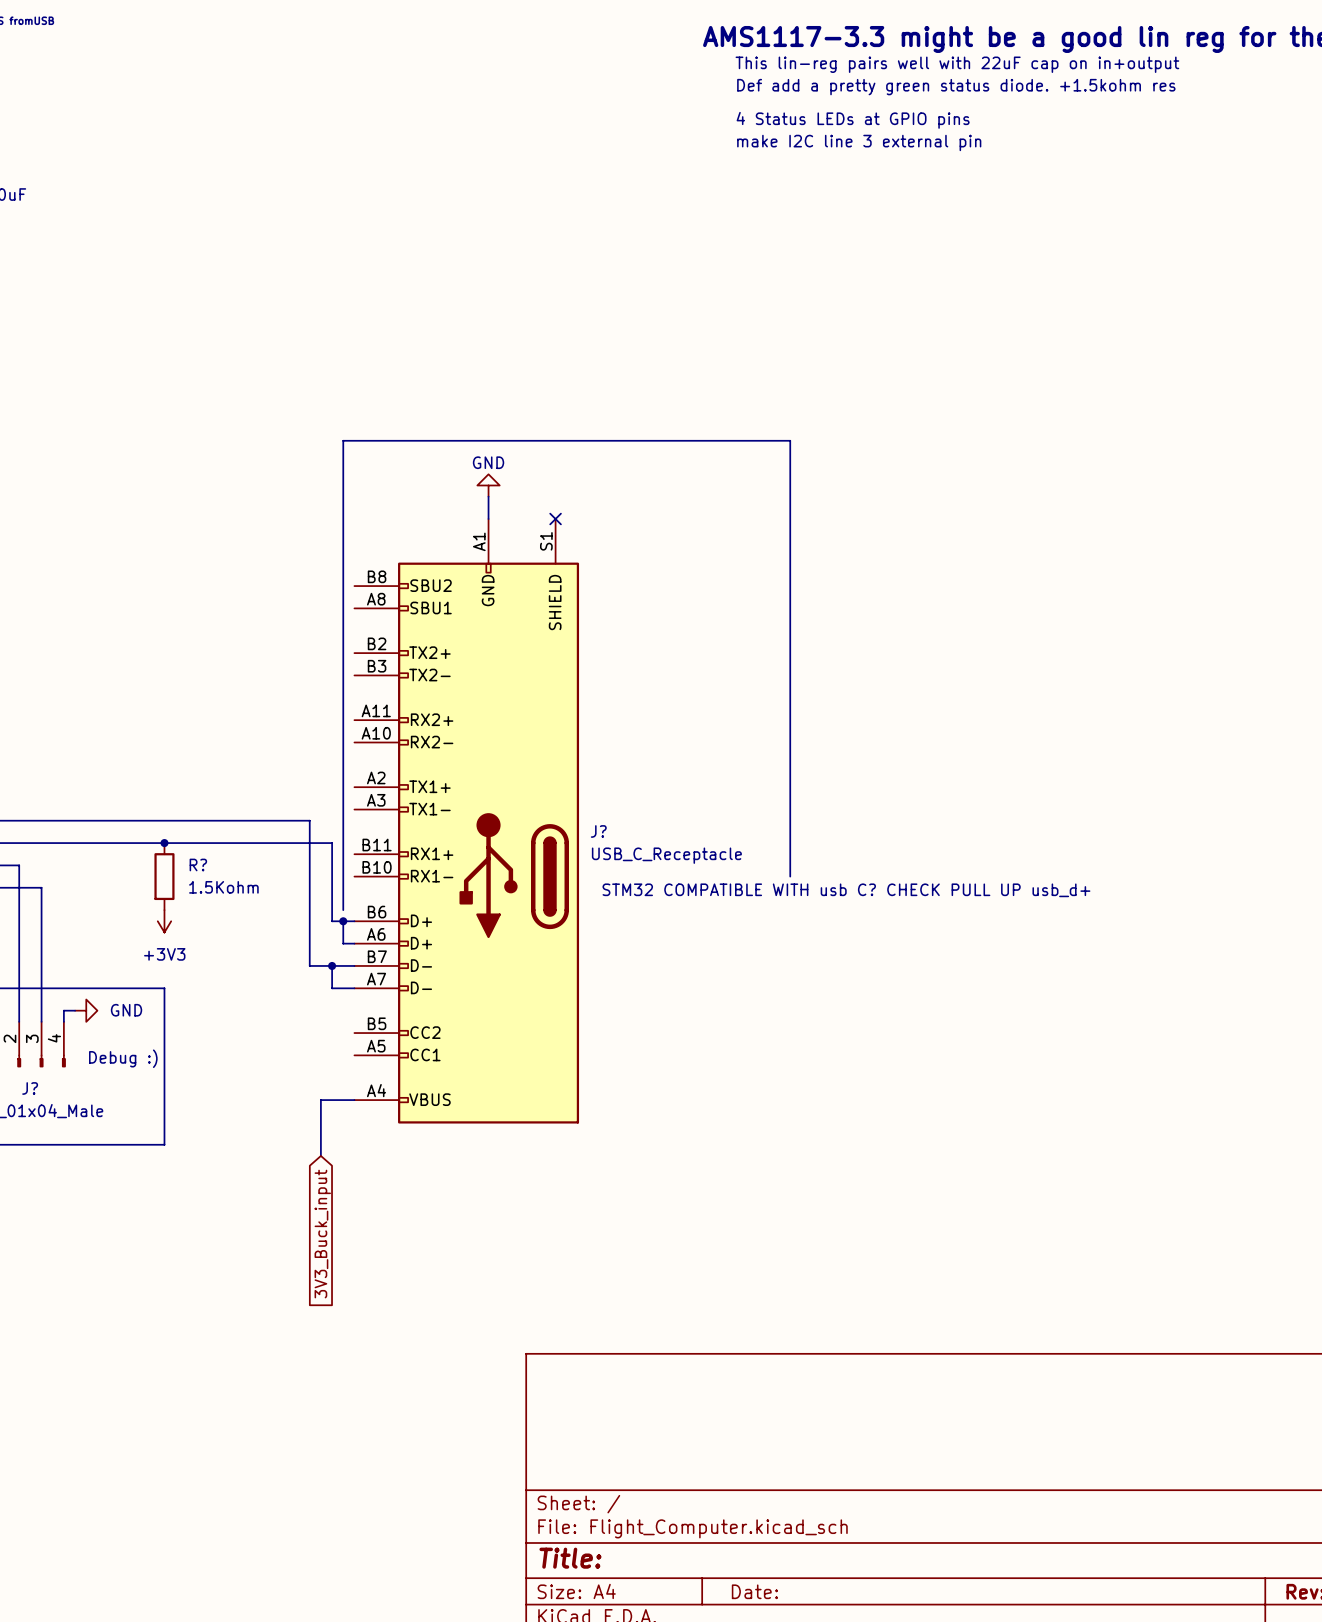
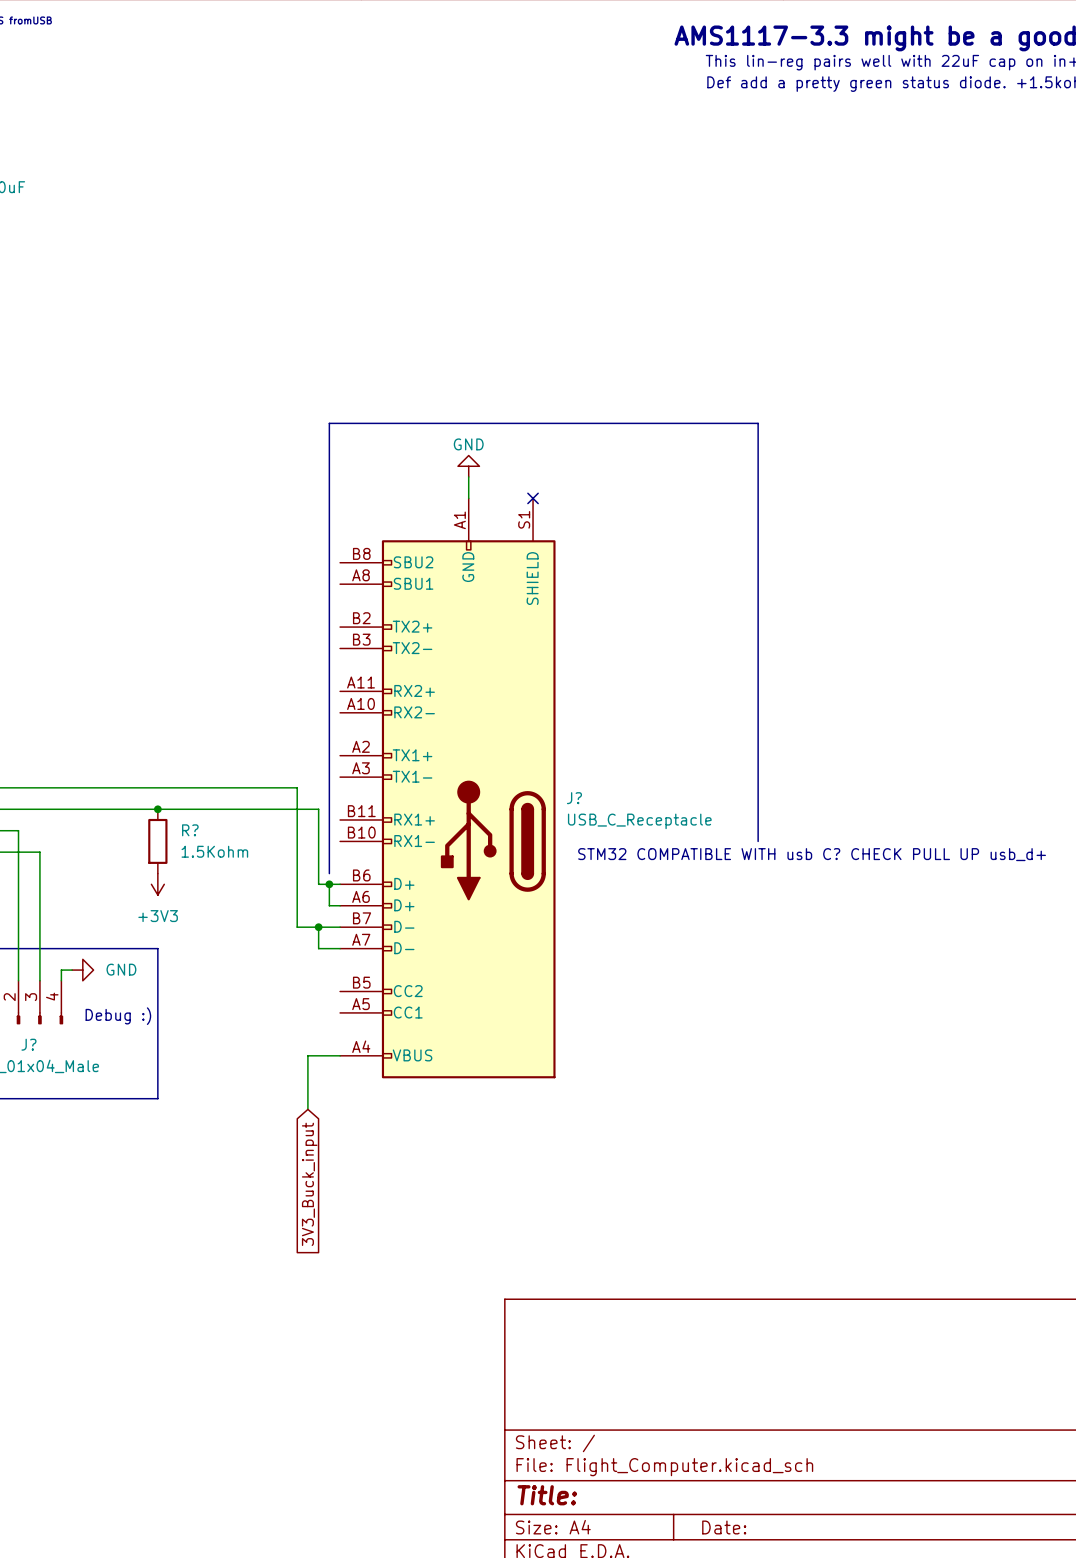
text: 4 Status LEDs at GPIO pins (853, 120) -> none
text: make I2C line 3 external pin (859, 142) -> none

